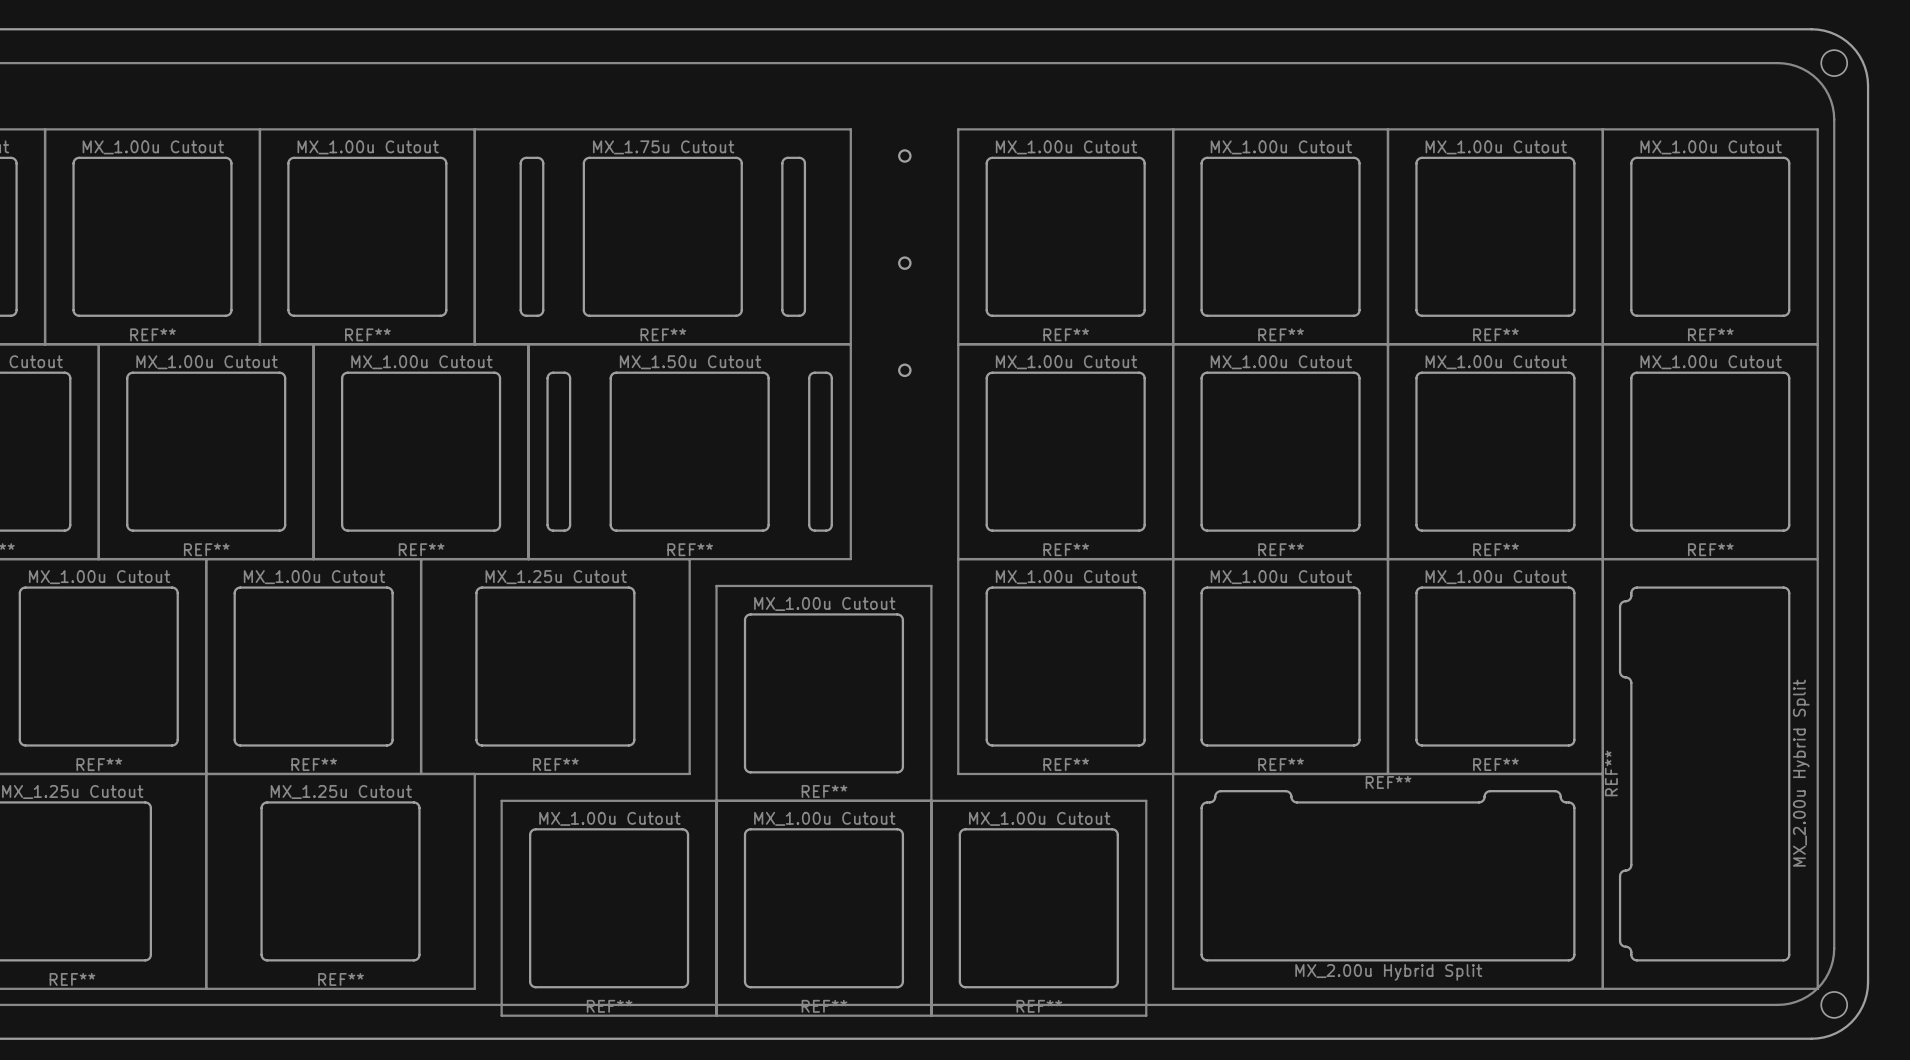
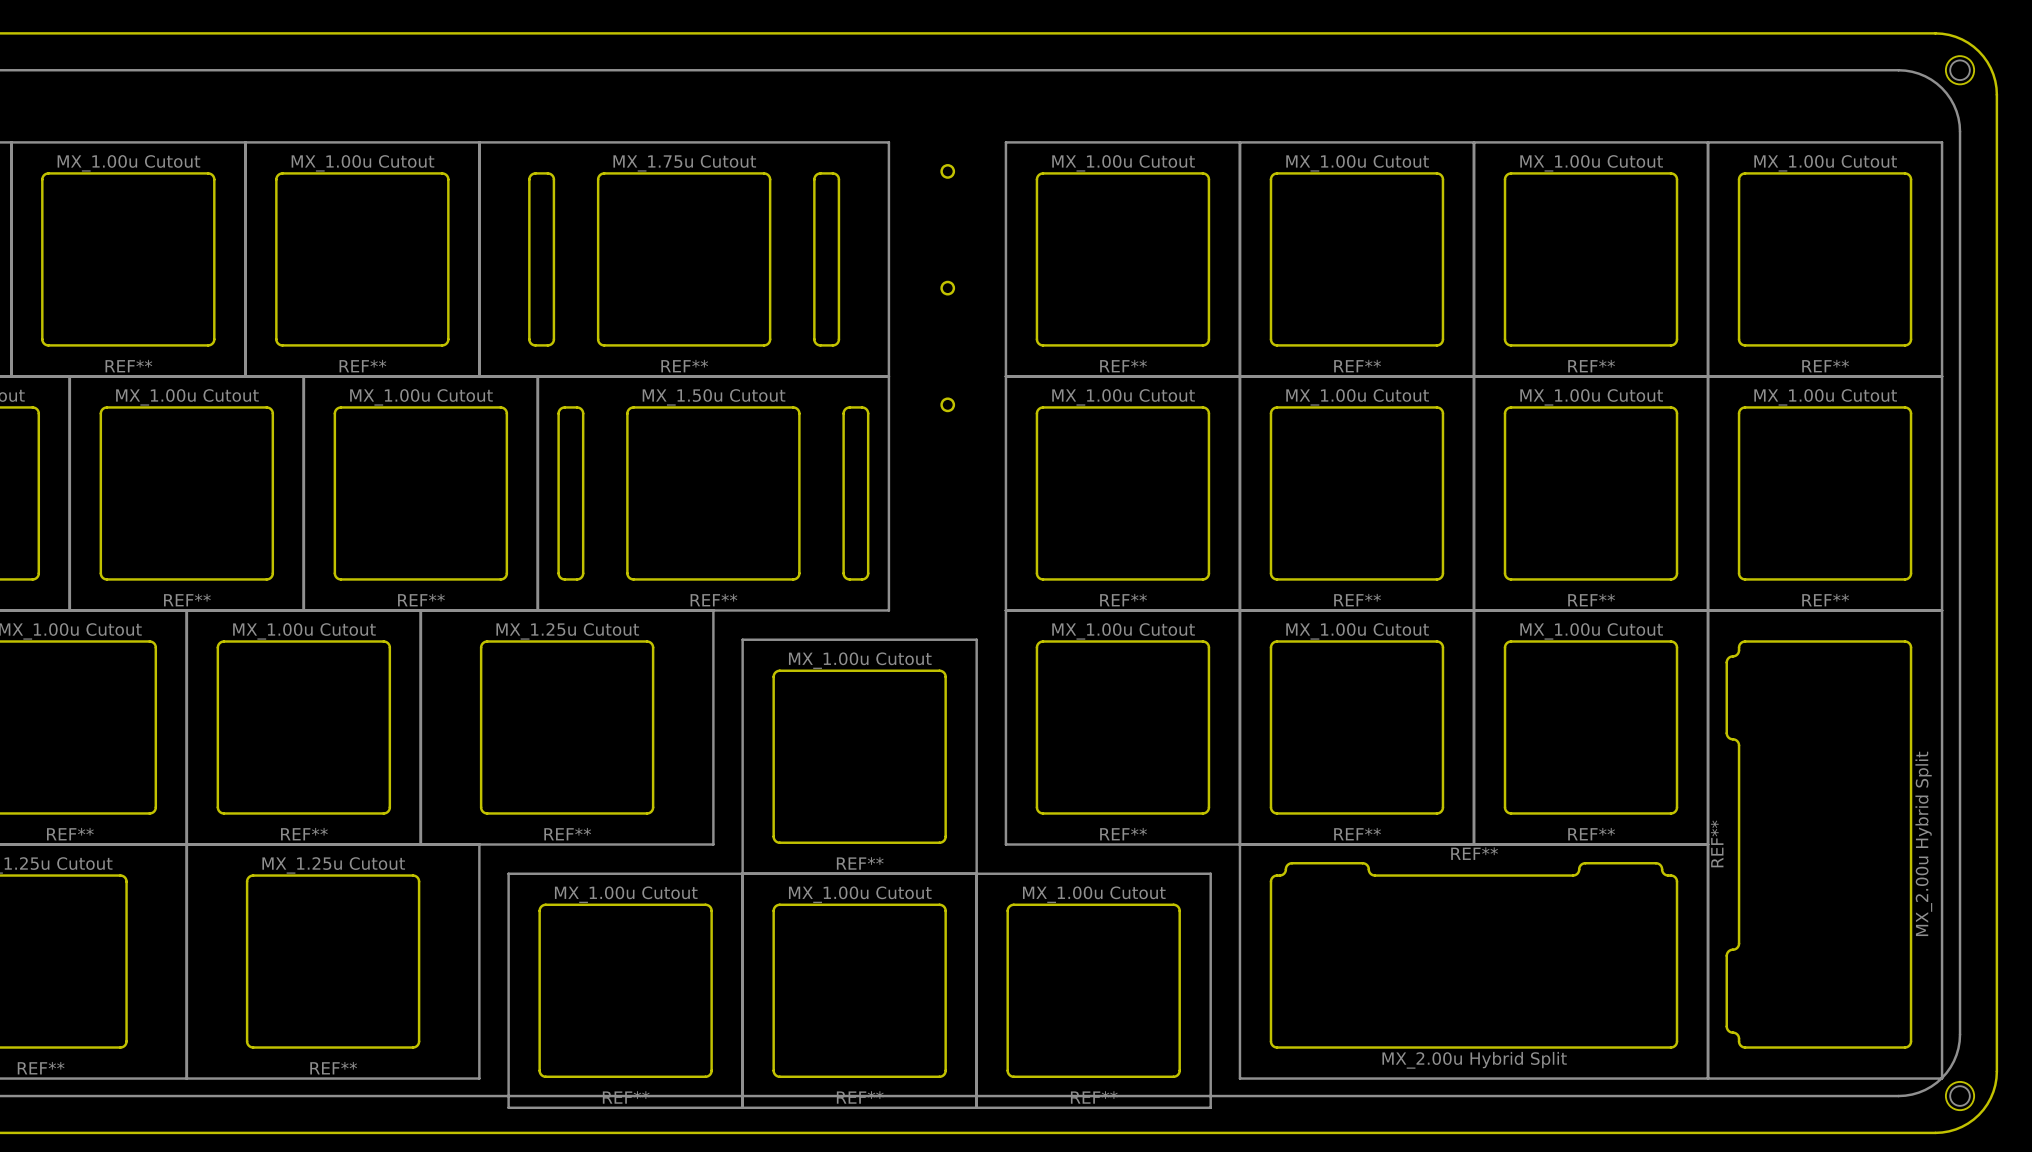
drawing: none -> [1949, 59, 1971, 81]
drawing: none -> [1949, 1085, 1971, 1107]

